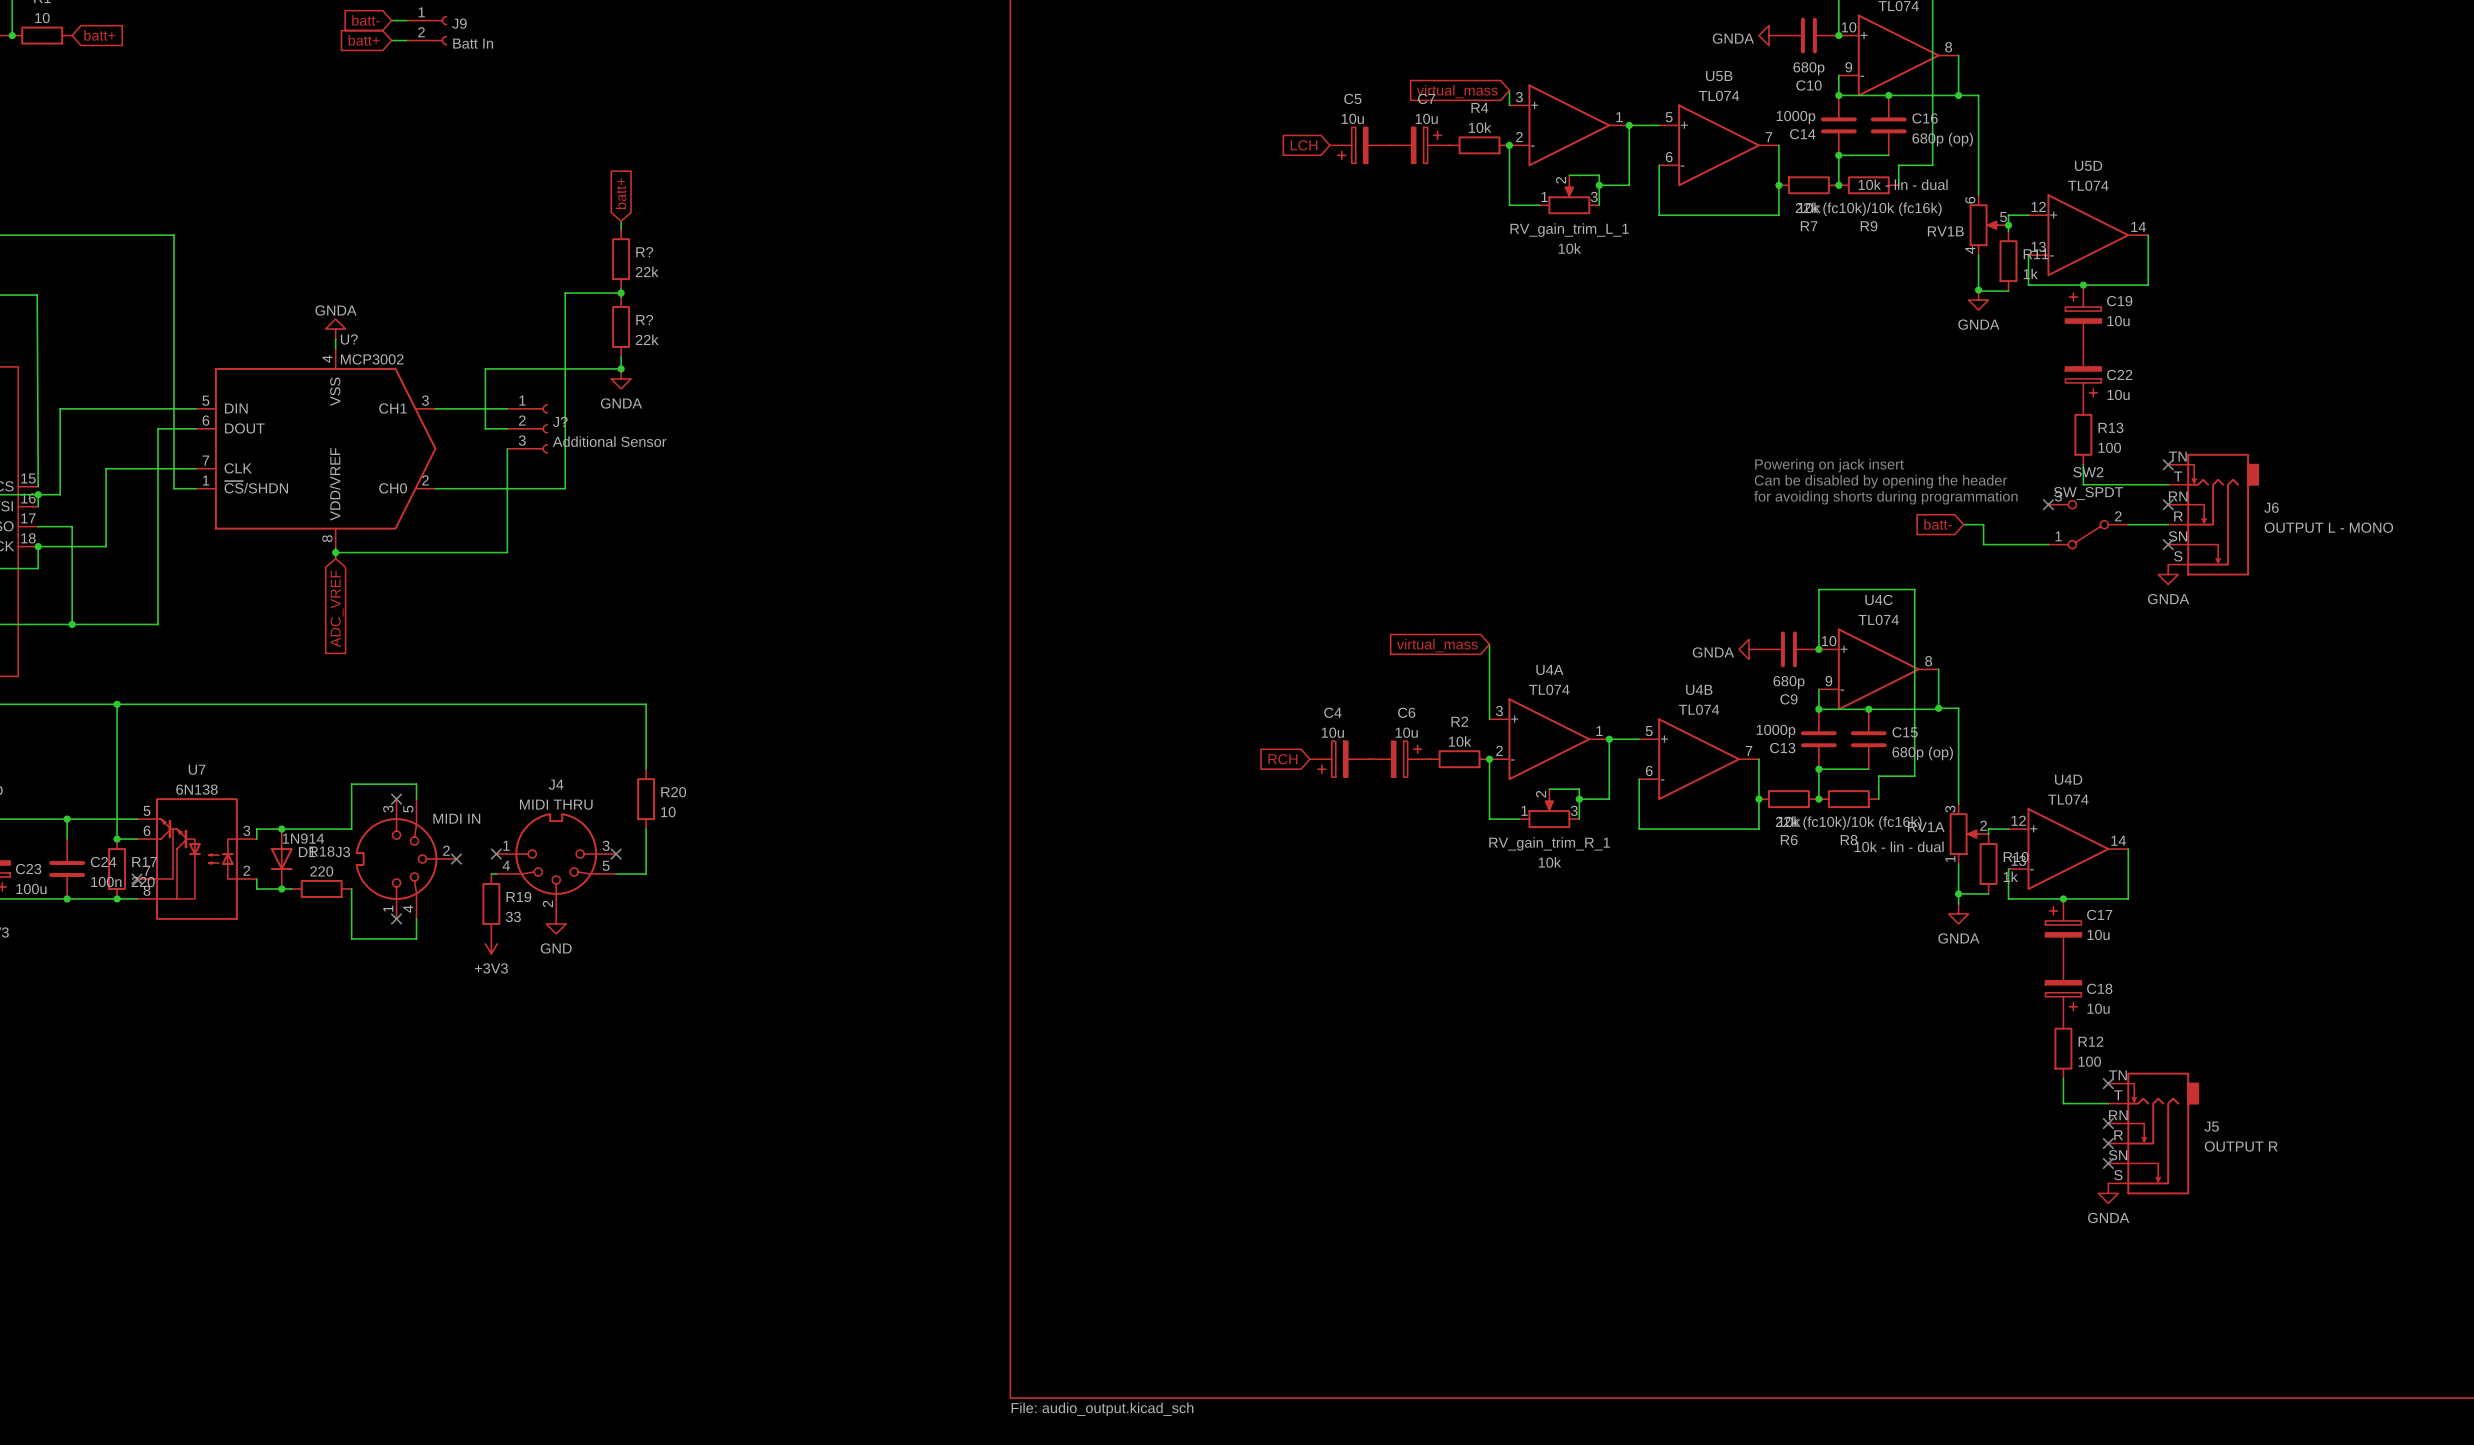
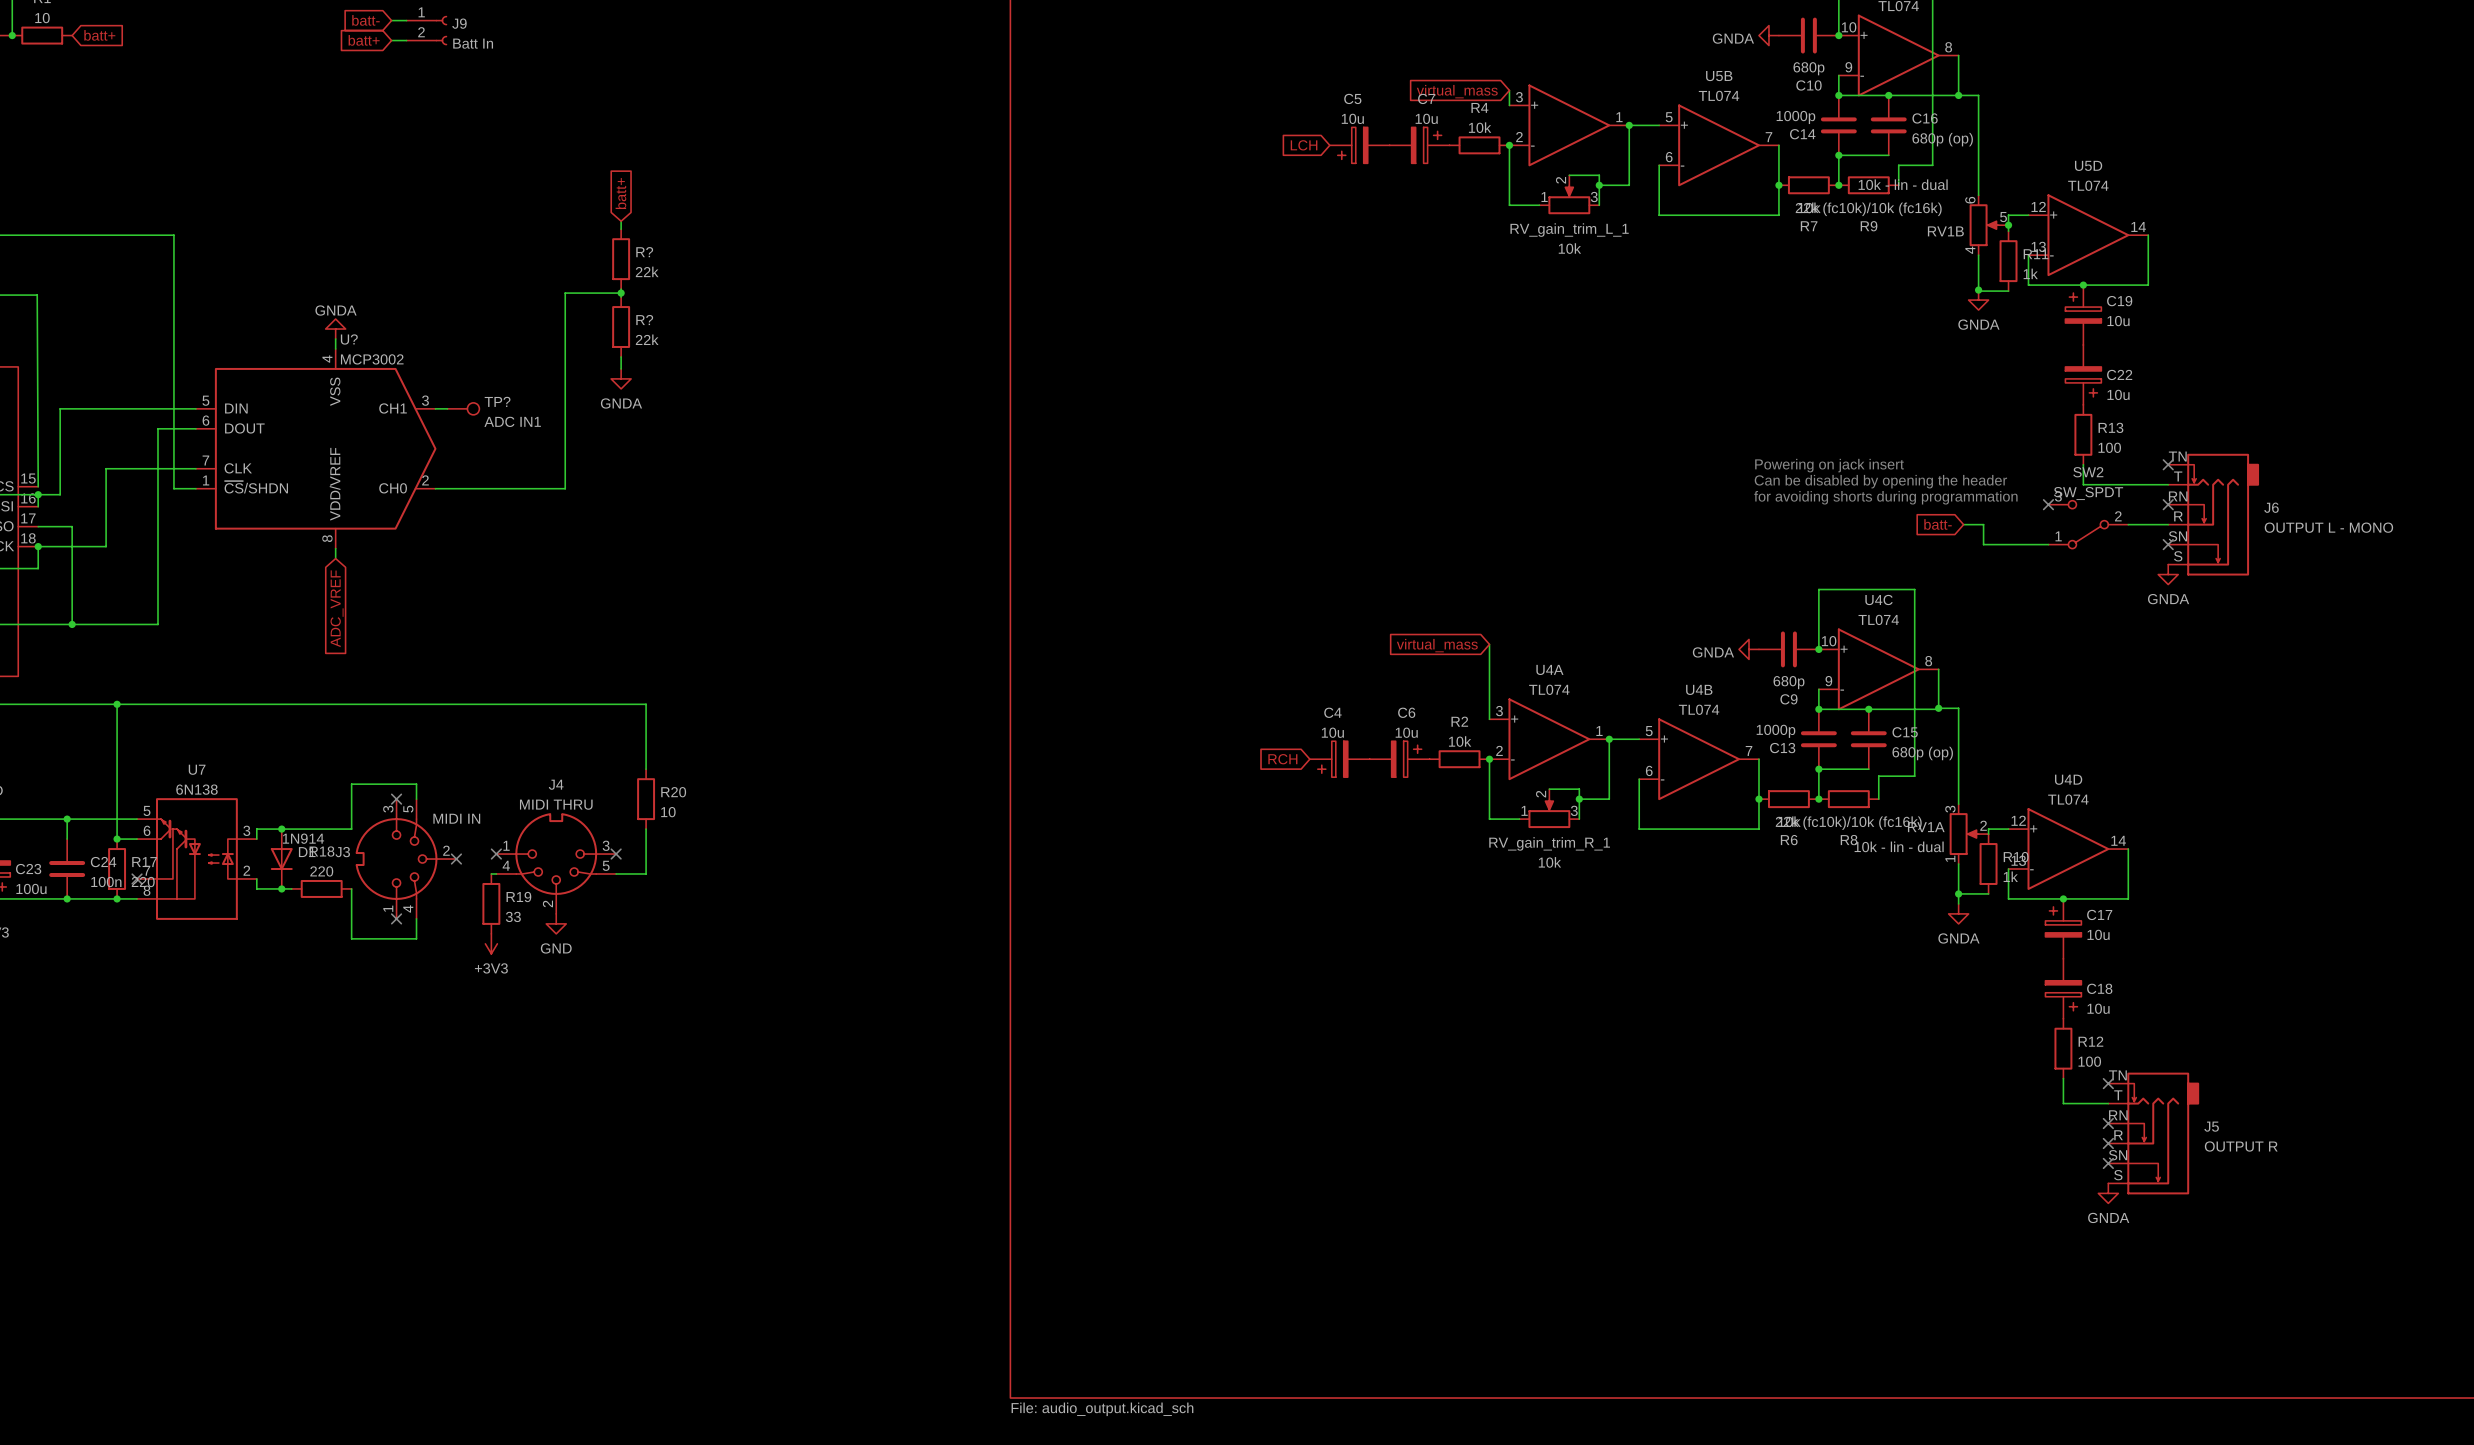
wire: (621, 368) (485, 368) (485, 428) (507, 428) -> none
junction: (621, 368) -> none
wire: (447, 408) (507, 408) -> none
TP?: none -> ADC IN1 (463, 408)
J?: Additional Sensor (527, 428) -> none
wire: (507, 448) (507, 552) (335, 552) -> none
junction: (335, 552) -> none

